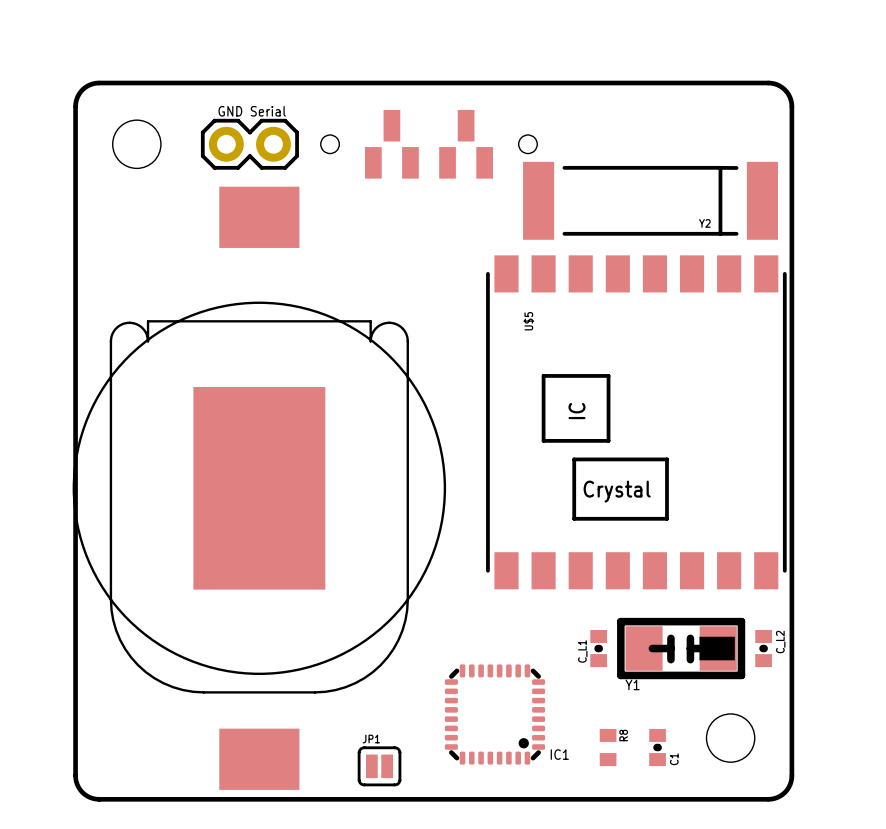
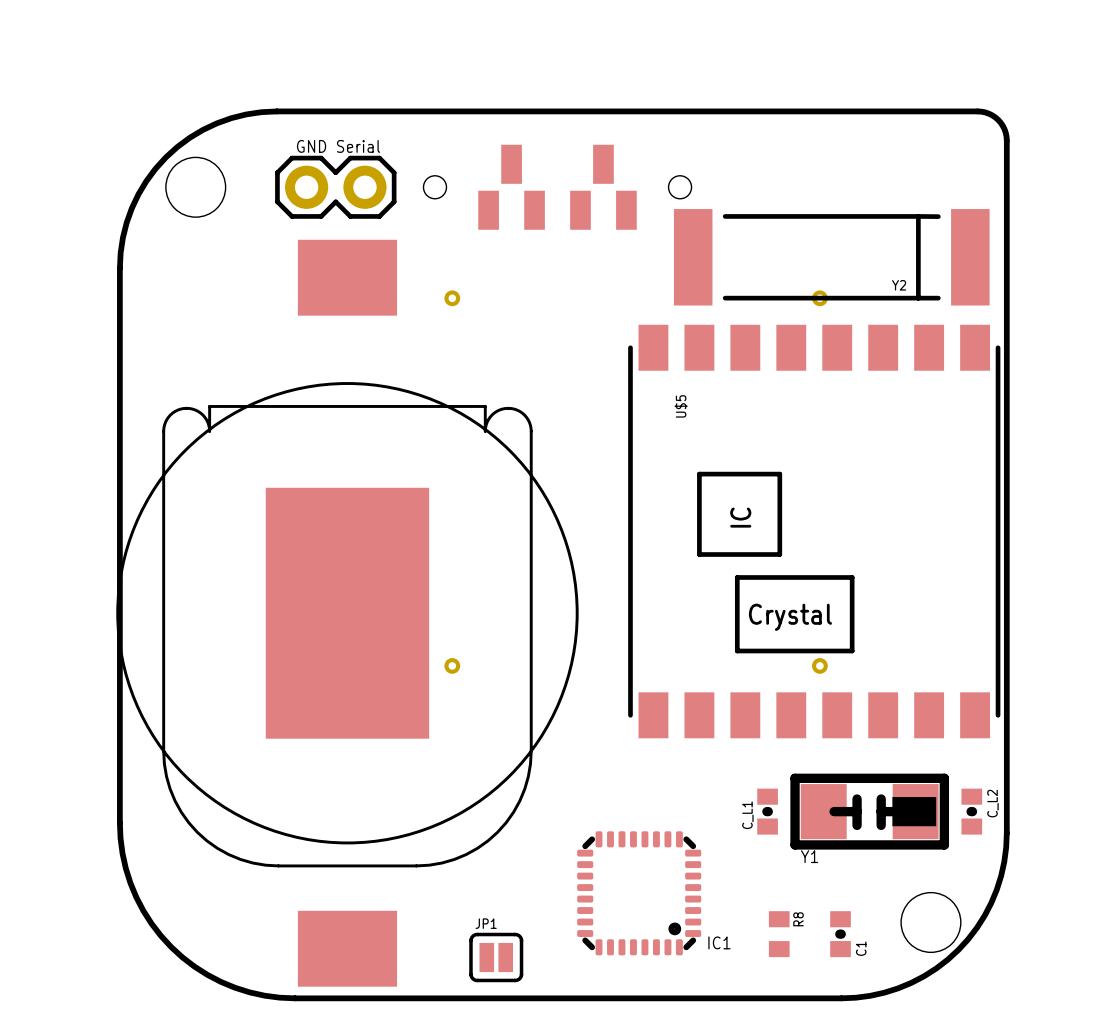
board edge: (202, 83) (99, 83) (90, 84) (82, 89) (77, 97) (75, 106) (75, 209) -> (276, 111) (246, 114) (216, 123) (189, 137) (165, 157) (146, 181) (131, 208) (122, 237) (119, 268)
part: none -> (452, 298)
part: none -> (819, 298)
part: none -> (452, 665)
part: none -> (819, 665)
board edge: (75, 657) (75, 775) (77, 784) (82, 792) (90, 797) (99, 799) (217, 799) -> (119, 823) (122, 853) (136, 897) (151, 923) (171, 947) (194, 966) (221, 981) (264, 995) (295, 998)
board edge: (791, 665) (791, 775) (790, 784) (784, 792) (777, 797) (768, 799) (658, 799) -> (1006, 833) (1001, 875) (991, 902) (976, 927) (958, 949) (936, 968) (911, 982) (884, 992) (841, 998)

